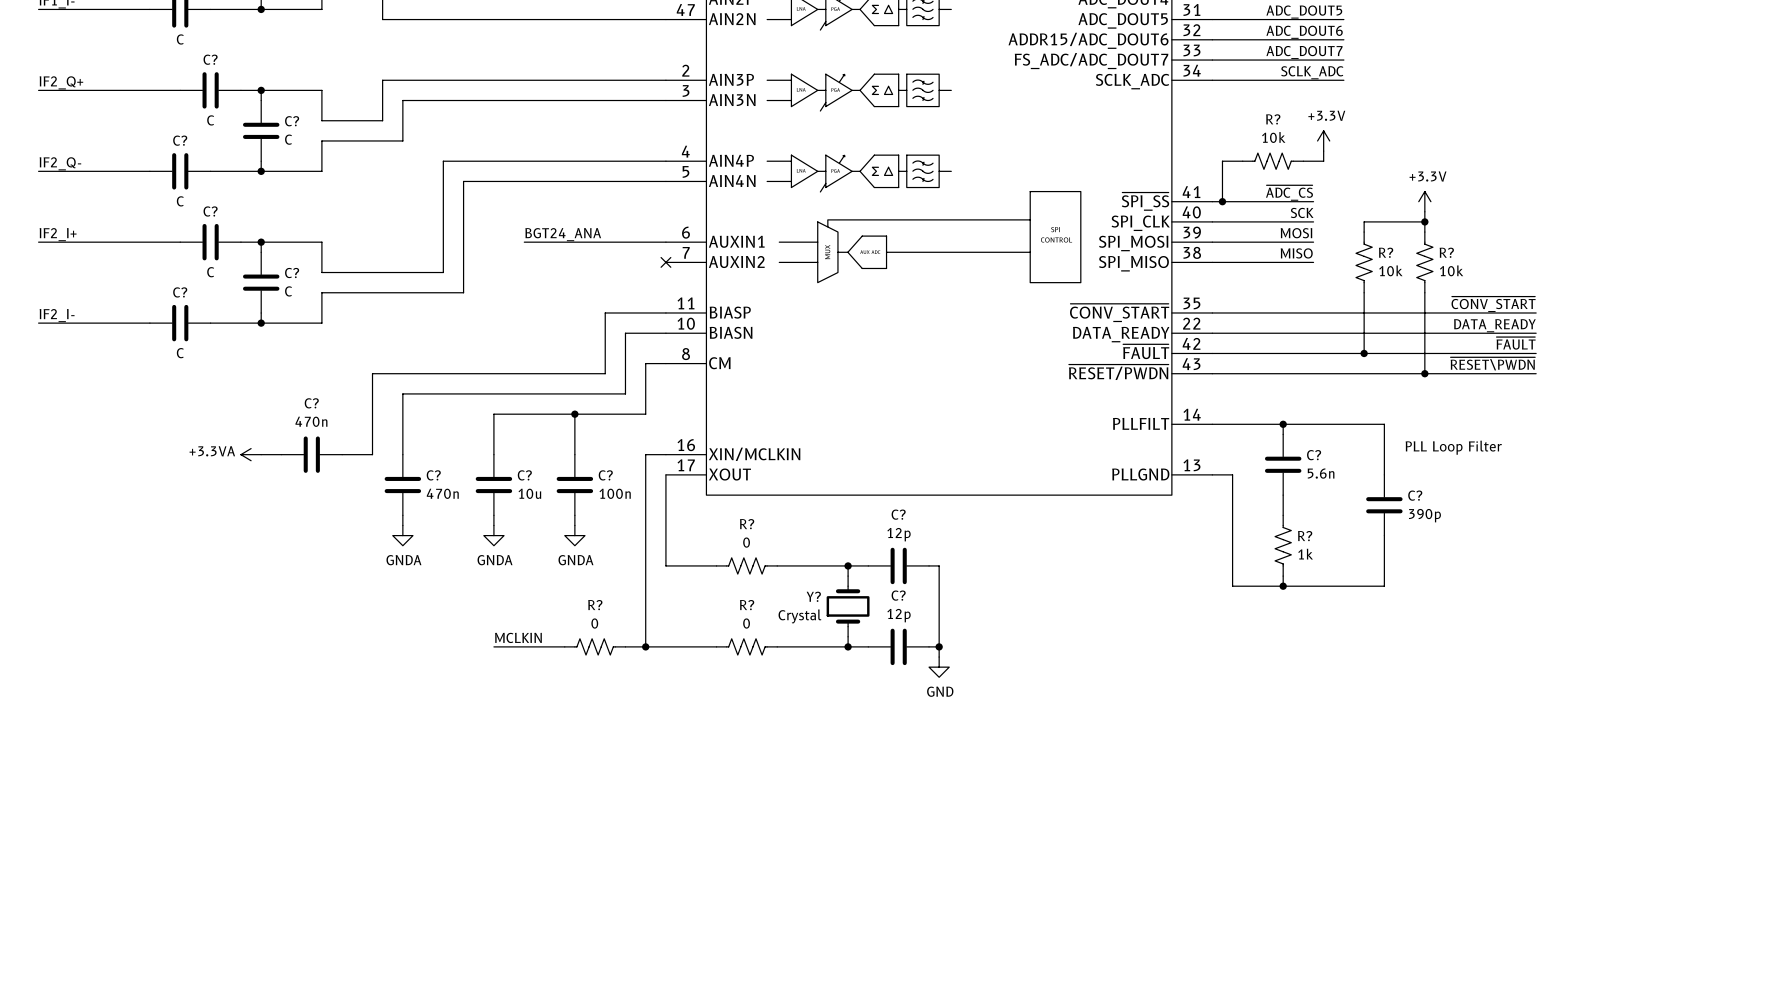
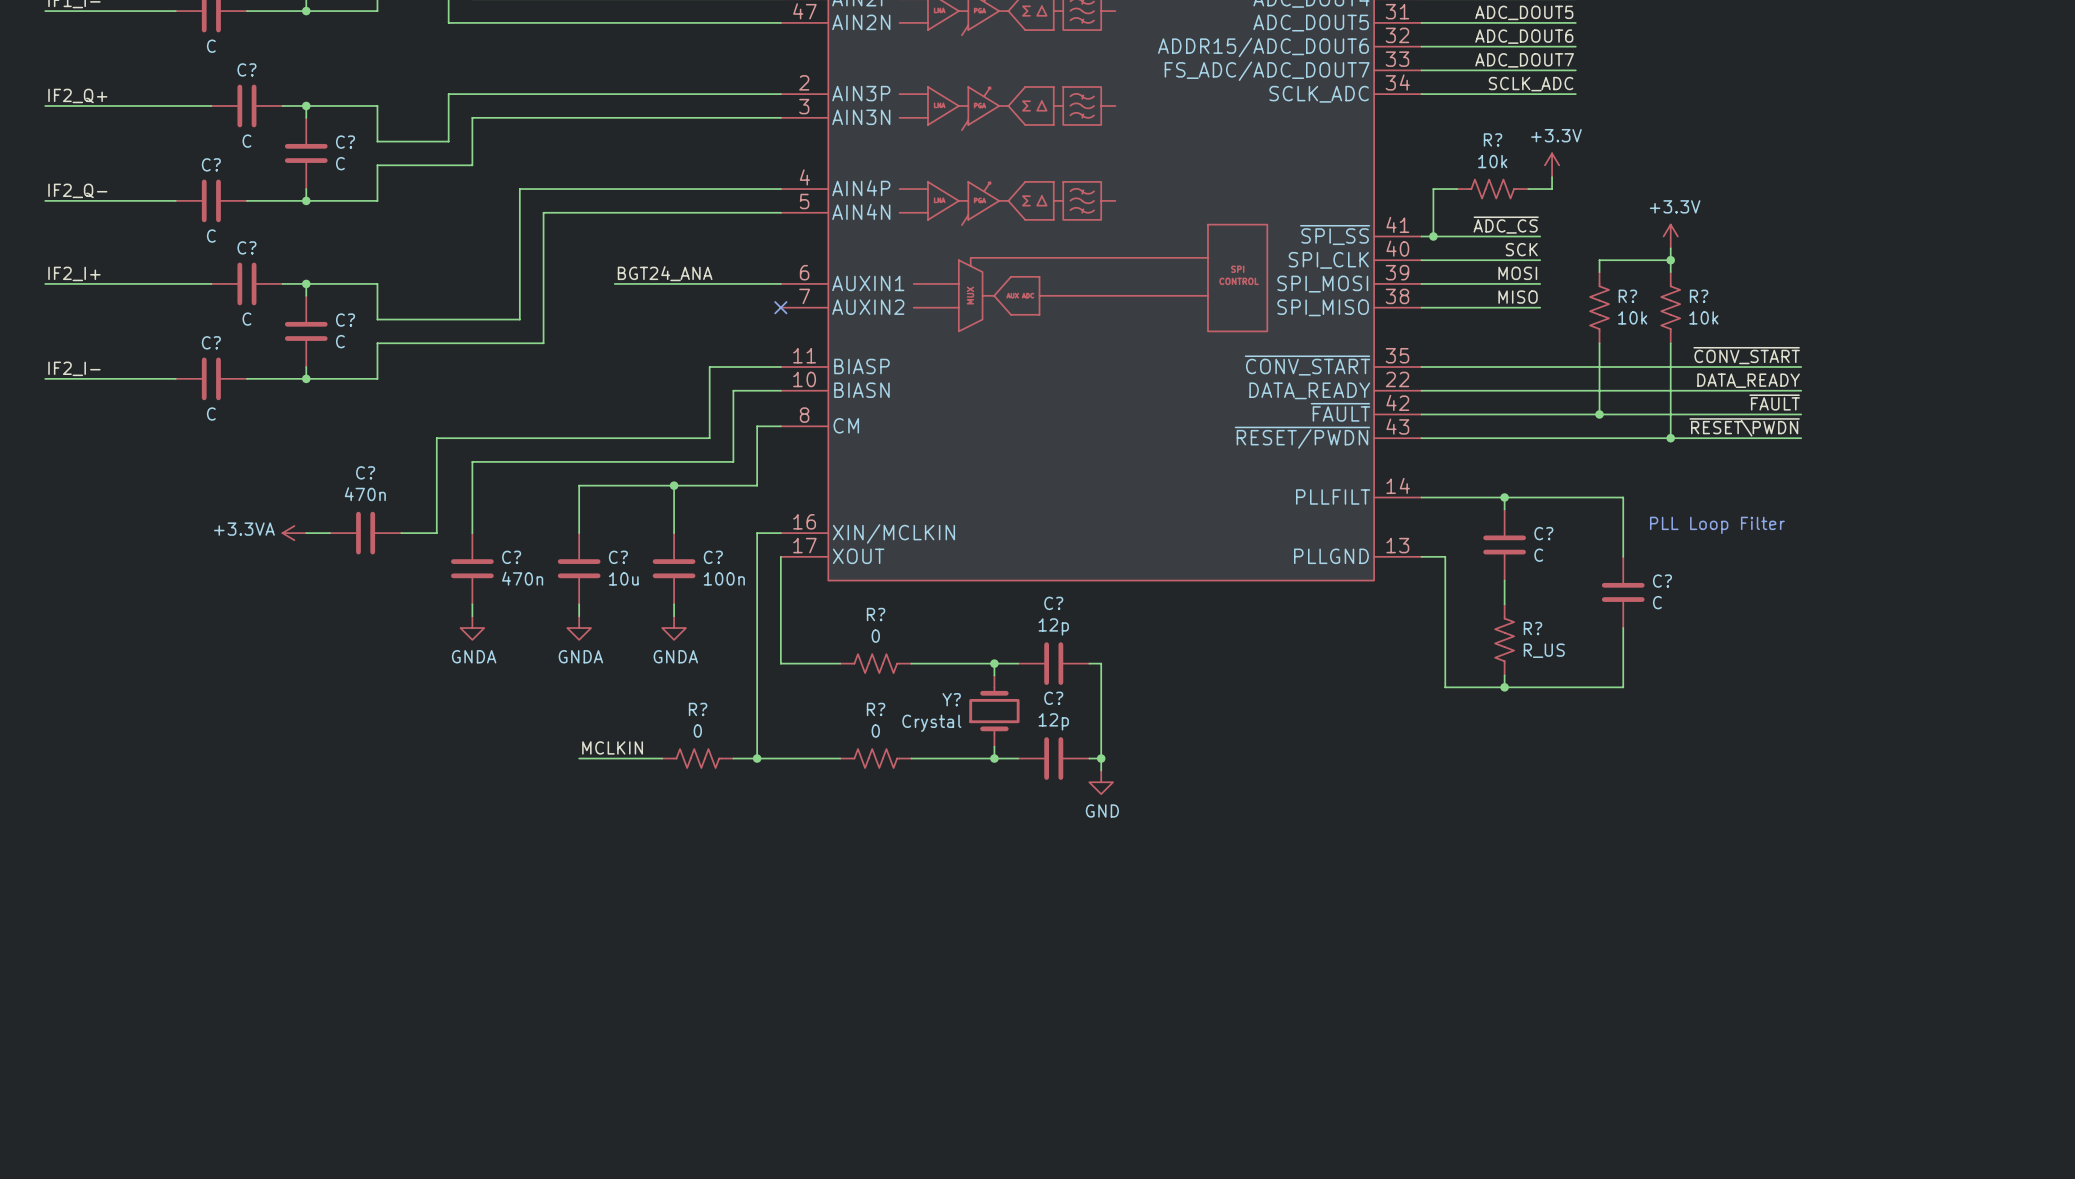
C? value: 5.6n (1321, 473) -> C (1538, 555)
C? value: 390p (1424, 515) -> C (1657, 602)
R? value: 1k (1305, 554) -> R_US (1544, 650)

